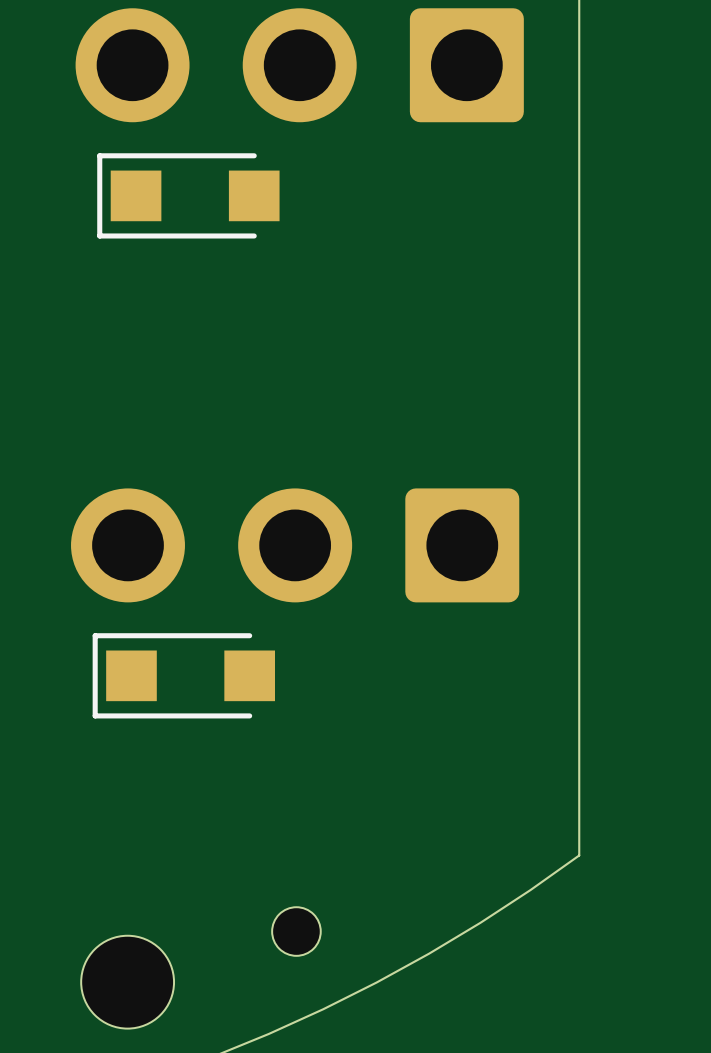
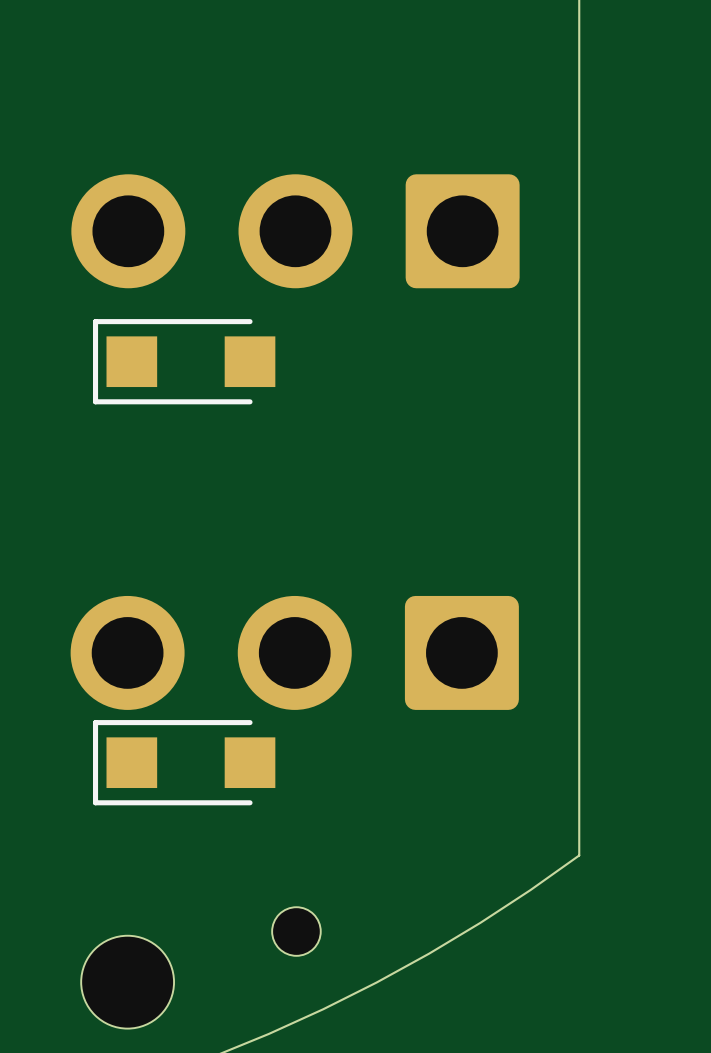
part: (299, 65) -> none
part: (188, 195) -> none
part: none -> (295, 231)
part: none -> (184, 361)
part position: (295, 545) -> (294, 652)
part position: (183, 675) -> (184, 762)

